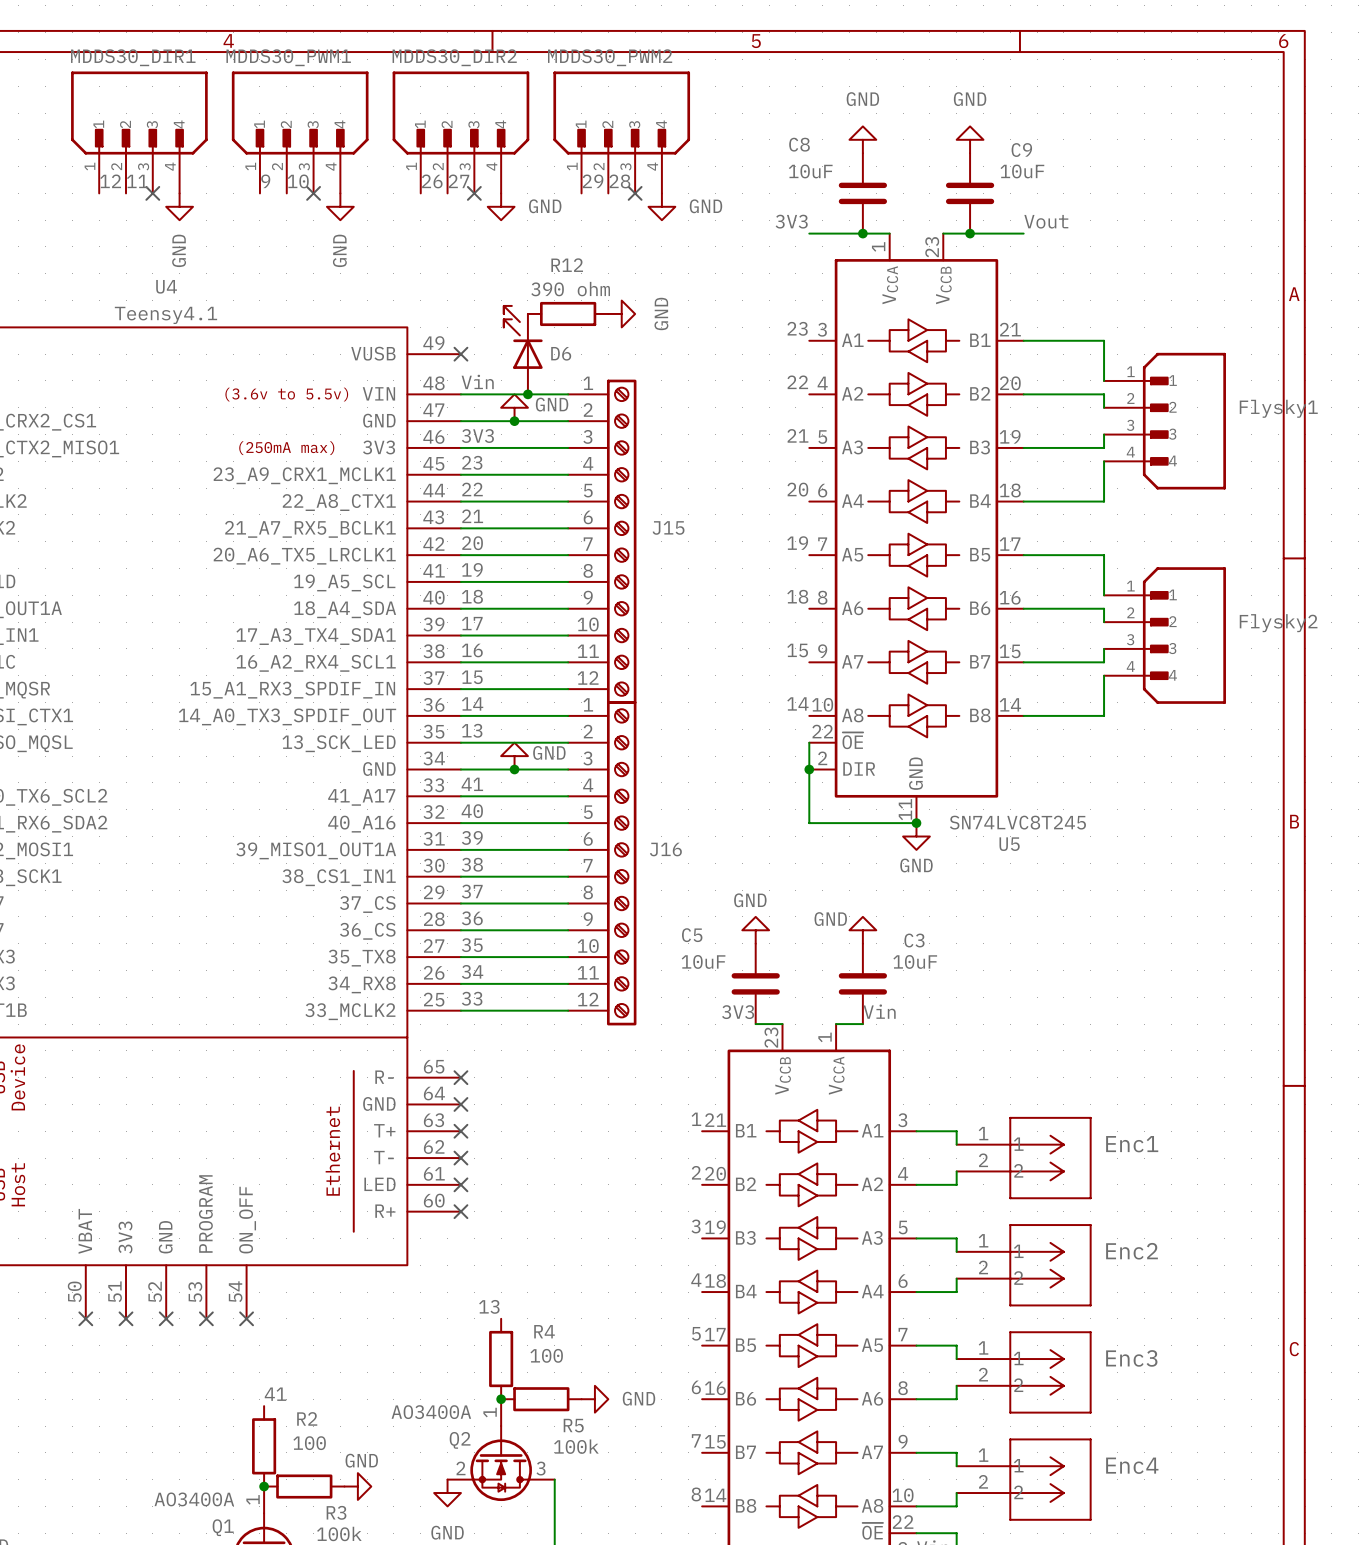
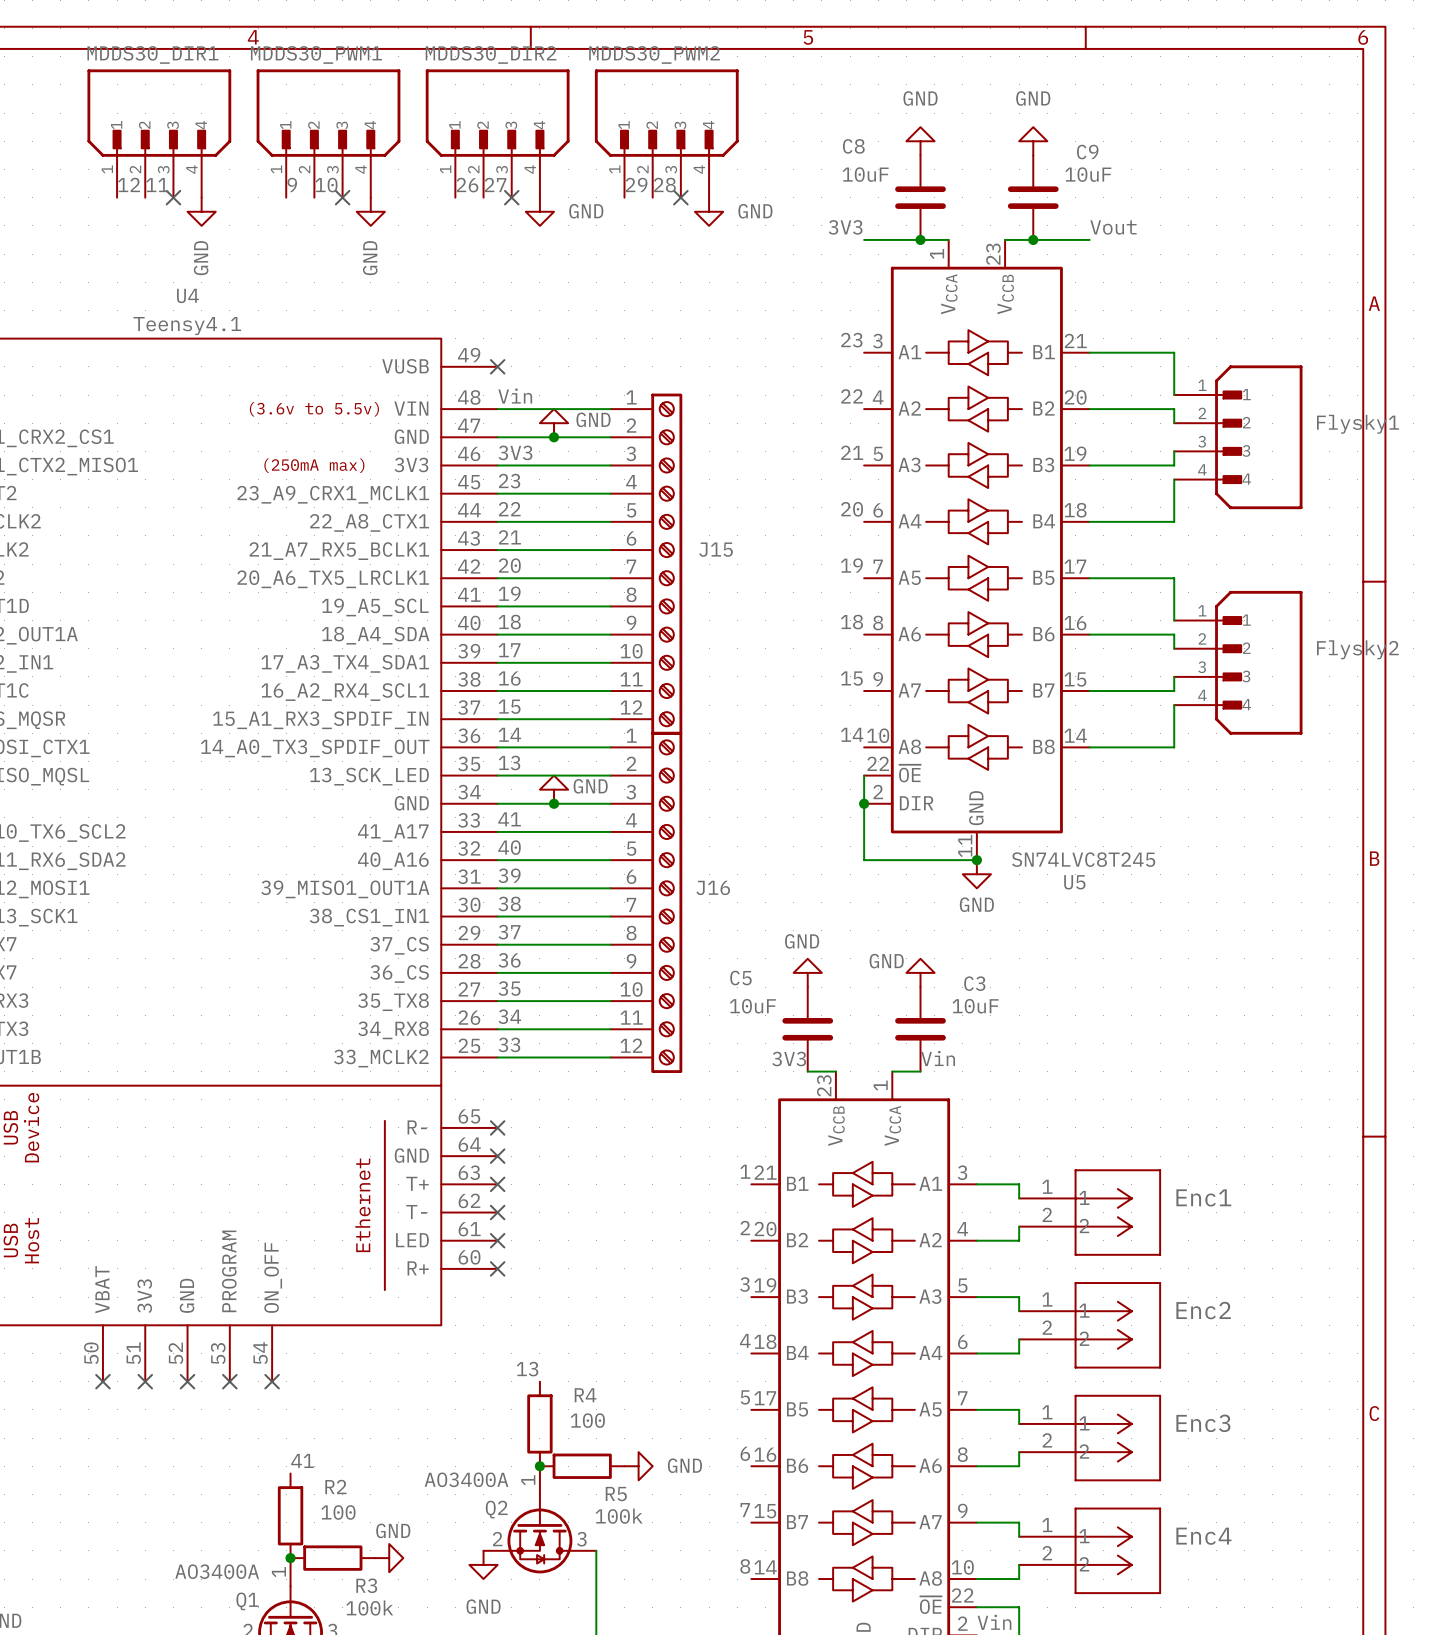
R12: 390 ohm (568, 313) -> none
power symbol: GND (621, 313) -> none
D6: (523, 350) -> none
junction: (527, 394) -> none

